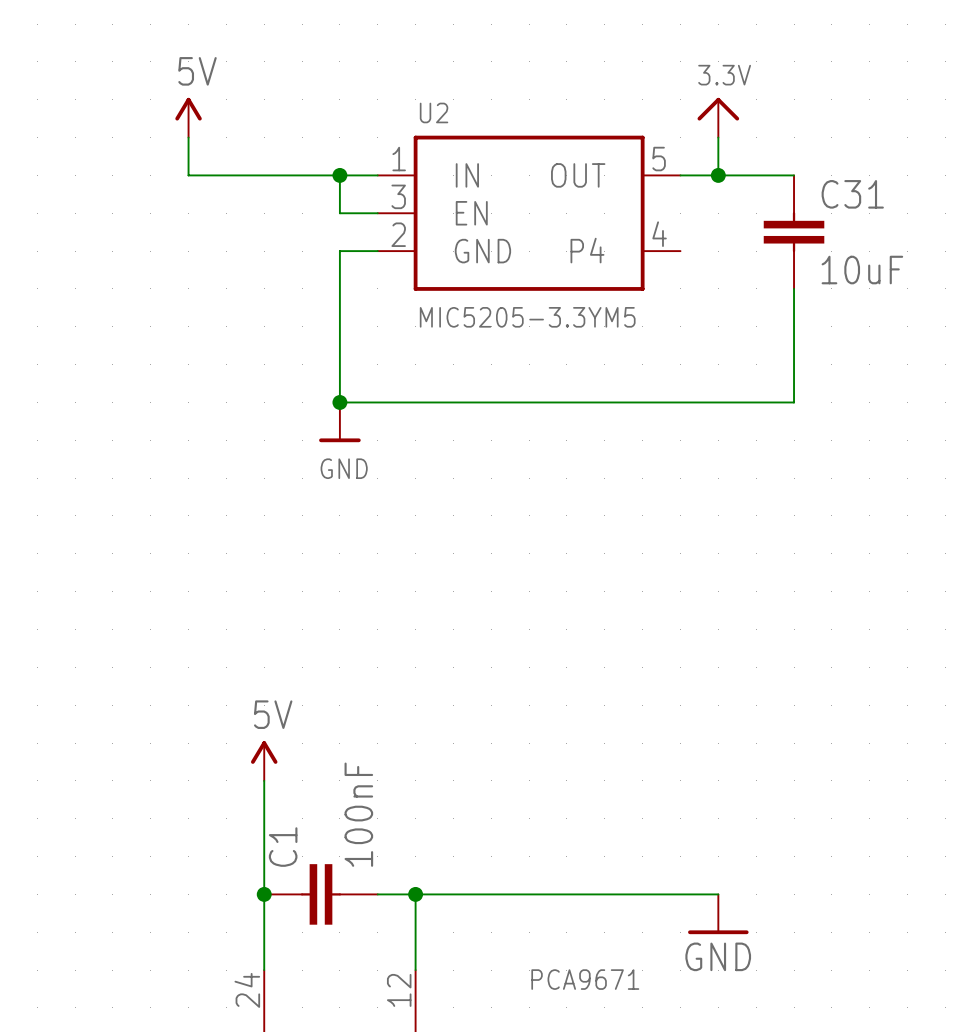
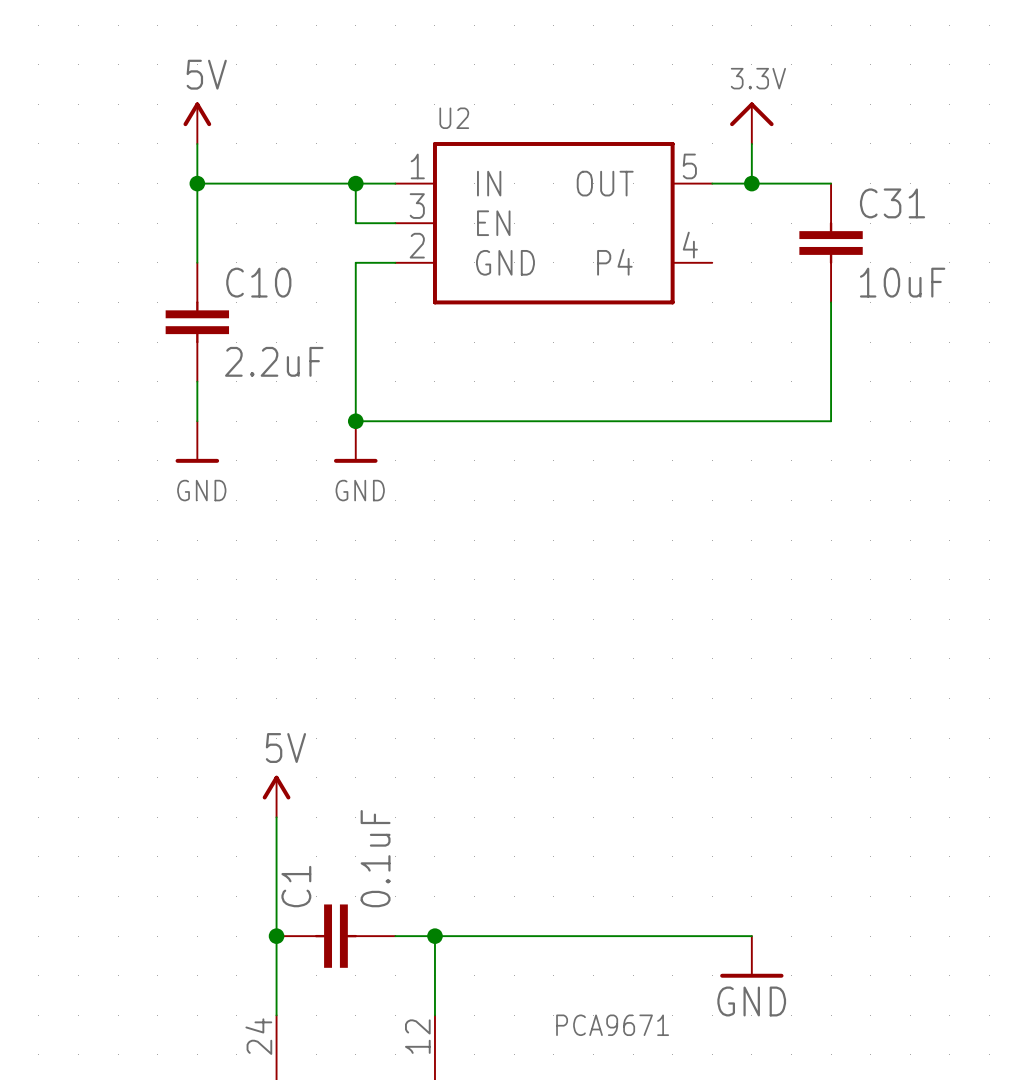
wire: none -> (197, 183) (197, 262)
junction: none -> (197, 183)
C10: none -> 2.2uF (197, 322)
U2 value: MIC5205-3.3YM5 (527, 317) -> none
wire: none -> (197, 381) (197, 421)
power symbol: none -> GND (197, 442)
C1 value: 100nF (358, 814) -> 0.1uF (375, 858)

